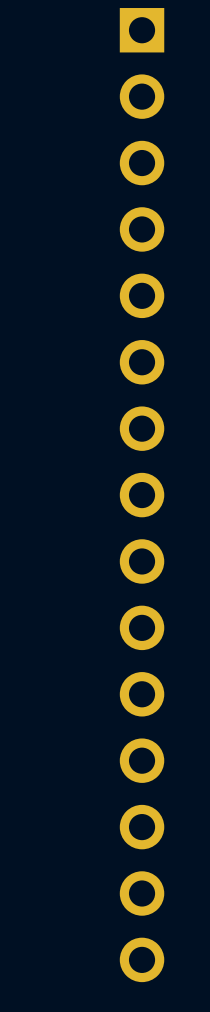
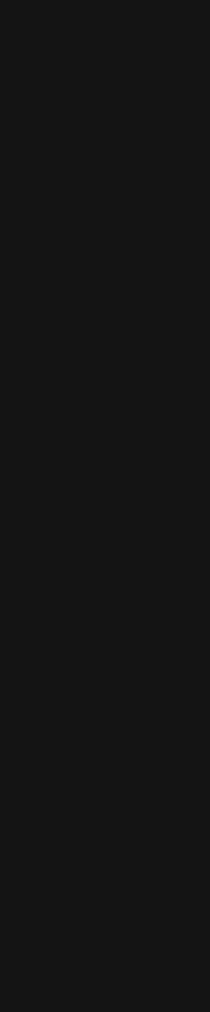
part: (142, 495) -> none

